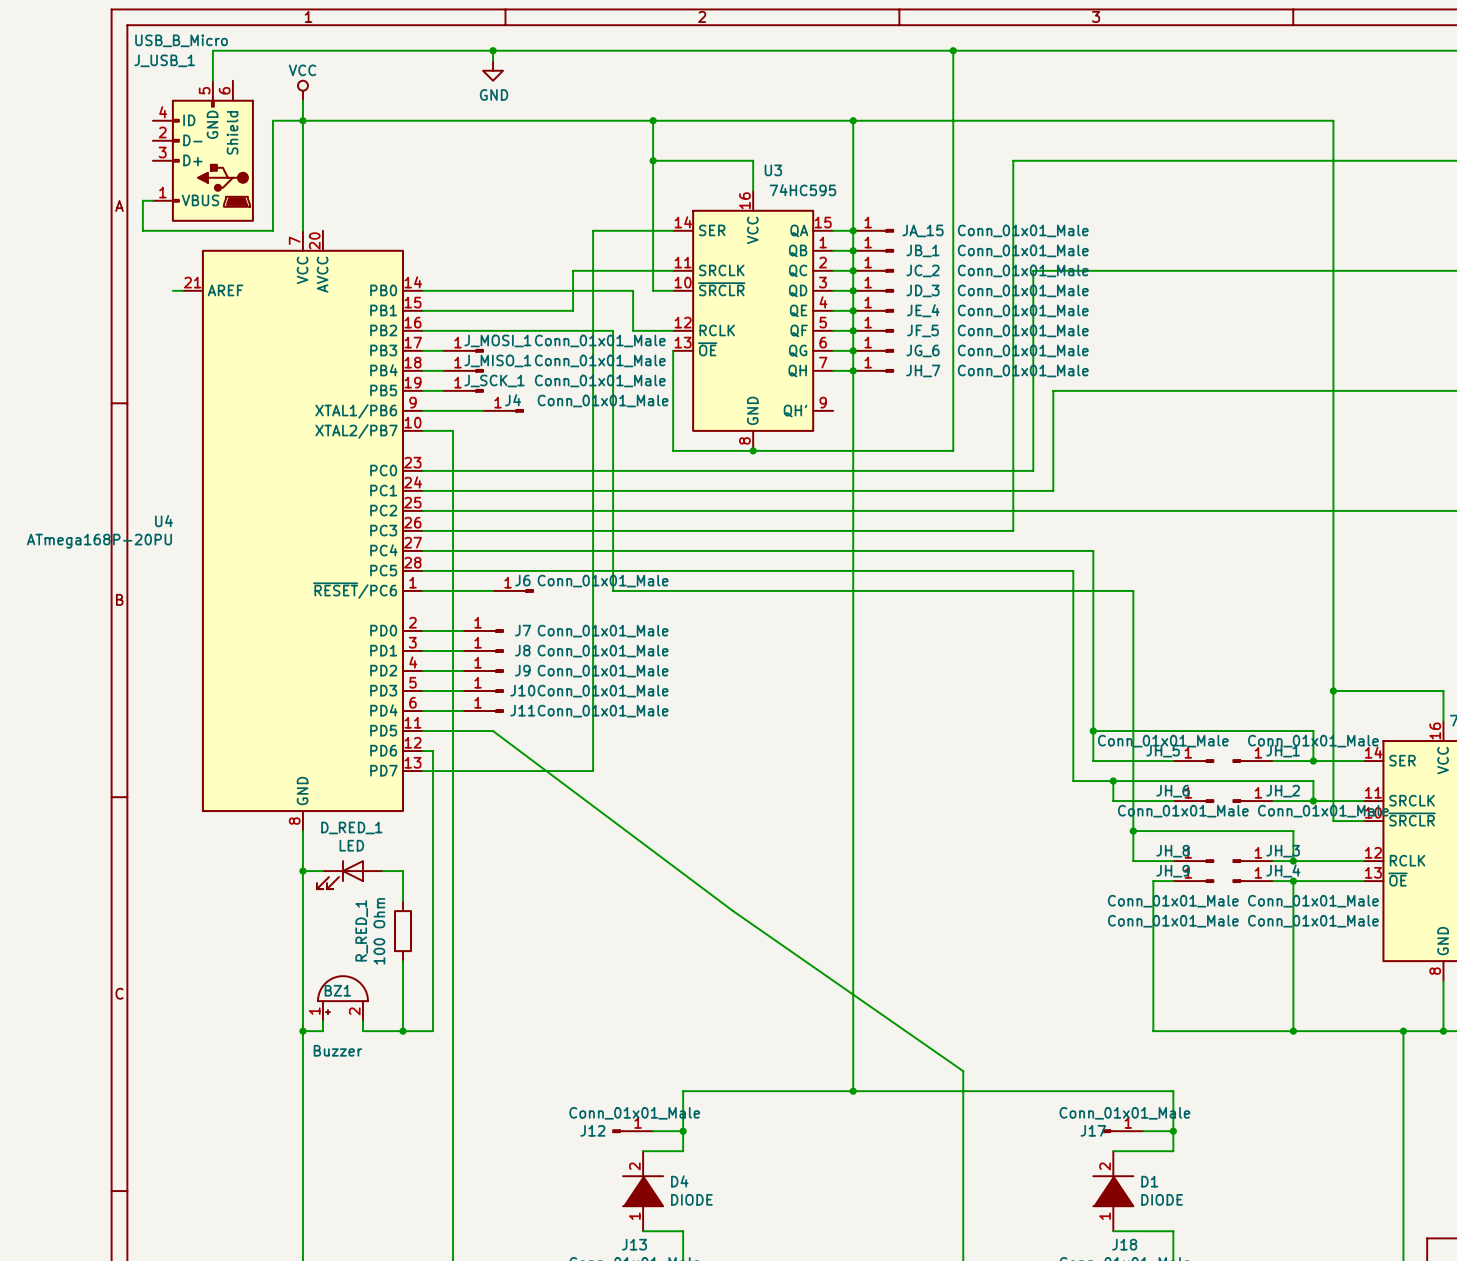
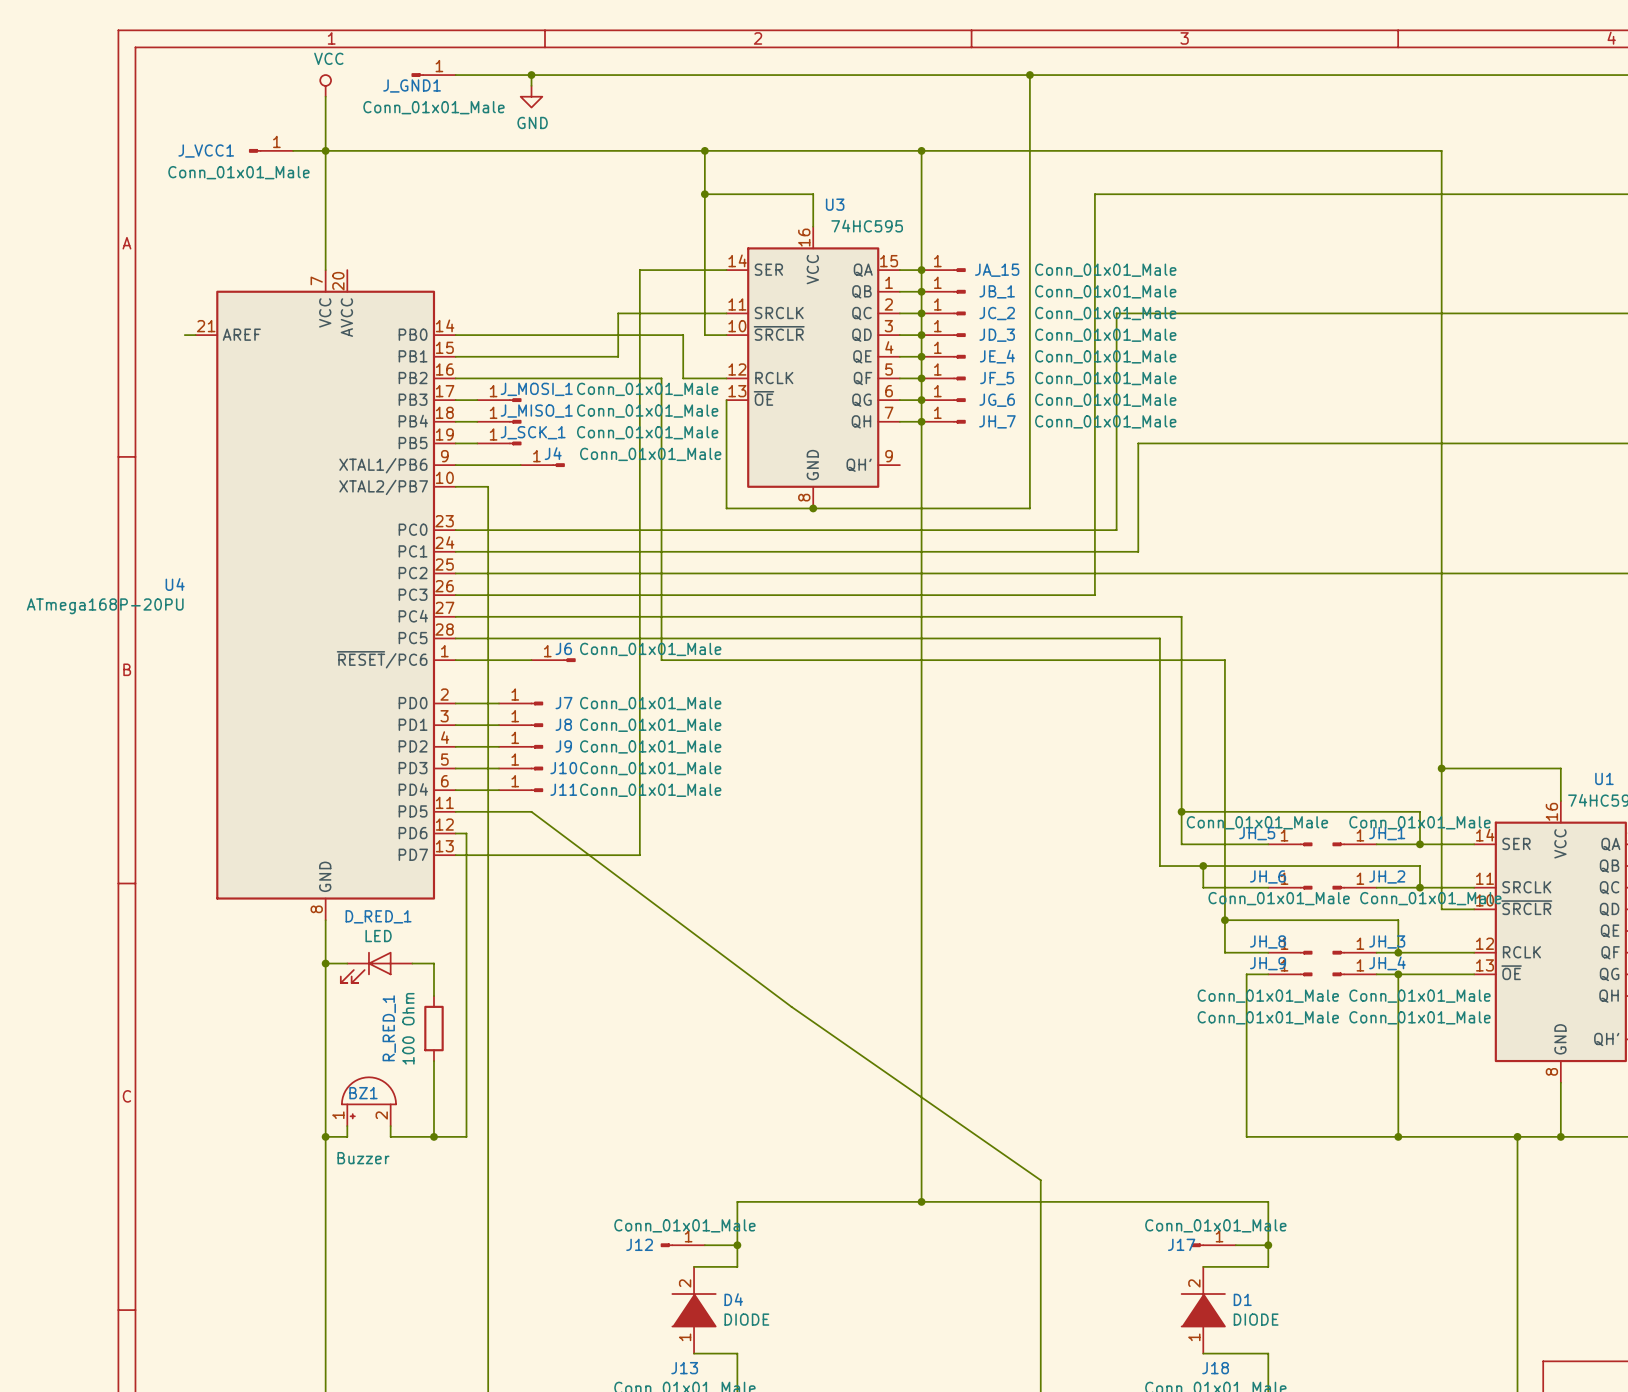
J_GND1: none -> Conn_01x01_Male (433, 75)
wire: (423, 50) (212, 50) (212, 80) -> none
wire: none -> (325, 96) (325, 129)
power symbol text position: VCC (302, 70) -> VCC (328, 58)
power symbol position: VCC (302, 90) -> VCC (325, 85)
J_VCC1: none -> Conn_01x01_Male (271, 150)
wire: (272, 120) (272, 230) (142, 230) (142, 200) (152, 200) -> none
J_USB_1: USB_B_Micro (203, 151) -> none

